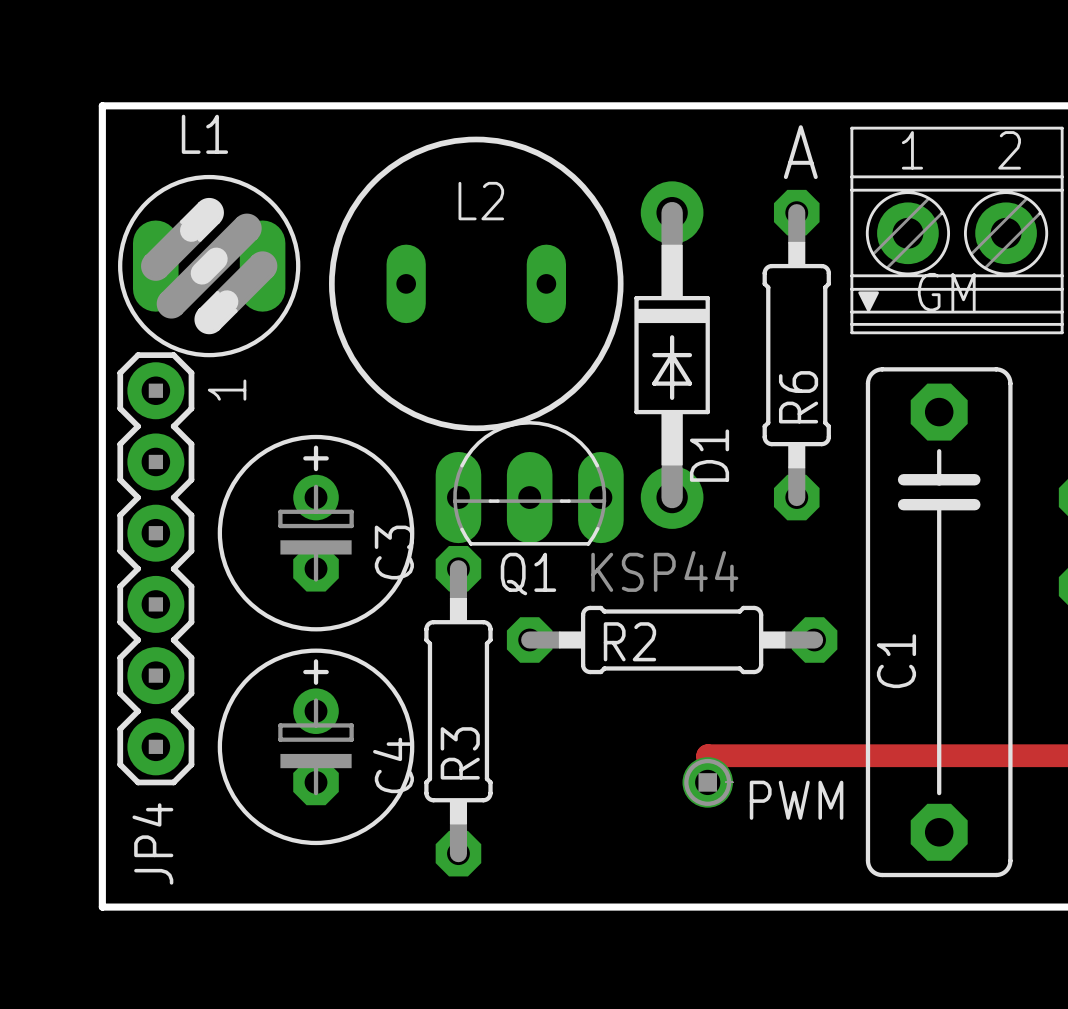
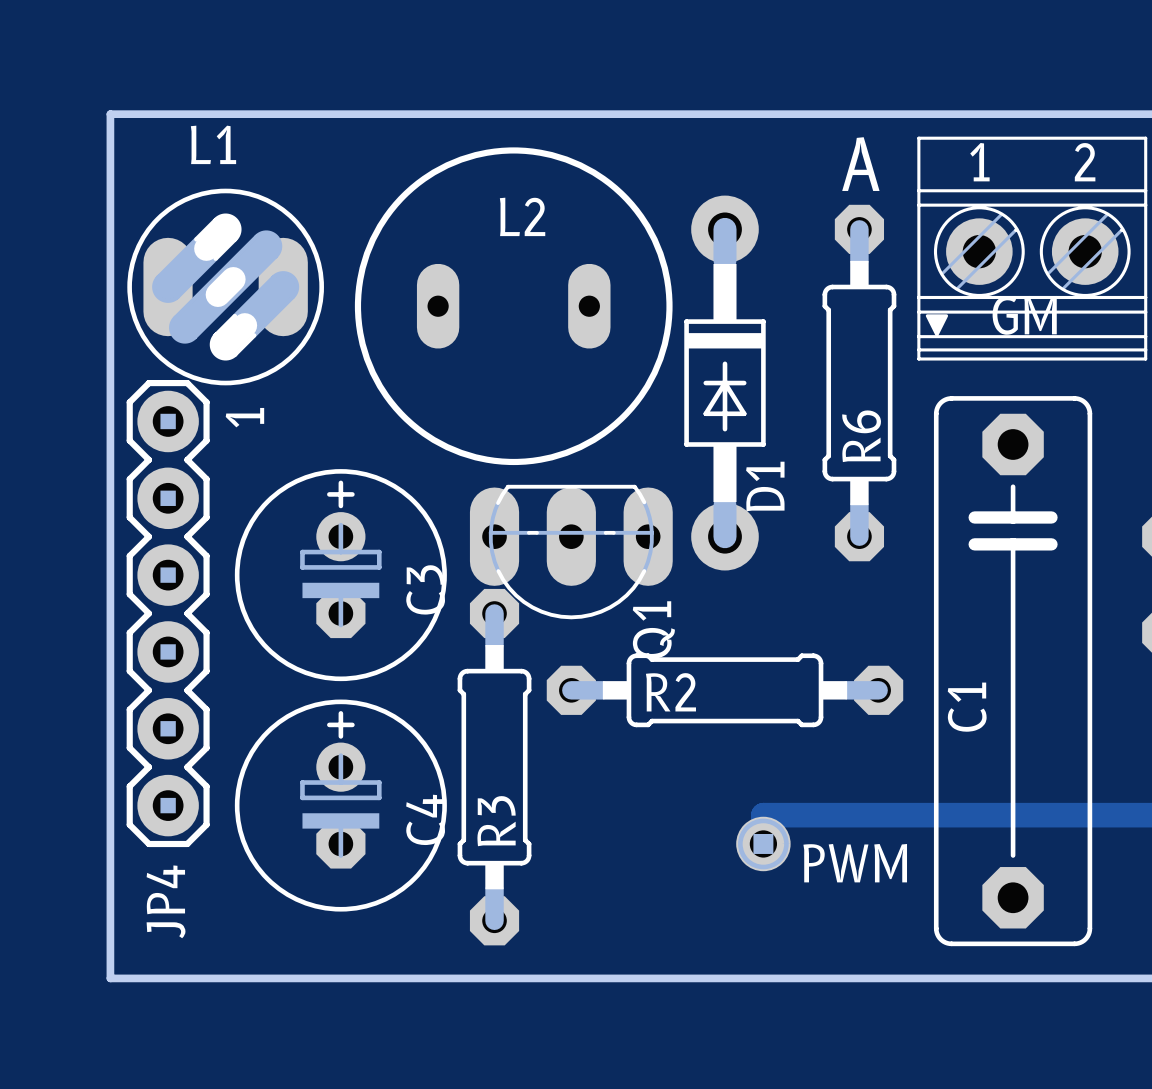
Q1 rotation: 0° (529, 483) -> 180° (571, 552)
Q1 value: KSP44 (664, 571) -> none
Q1 name position: Q1 (528, 574) -> Q1 (653, 629)

